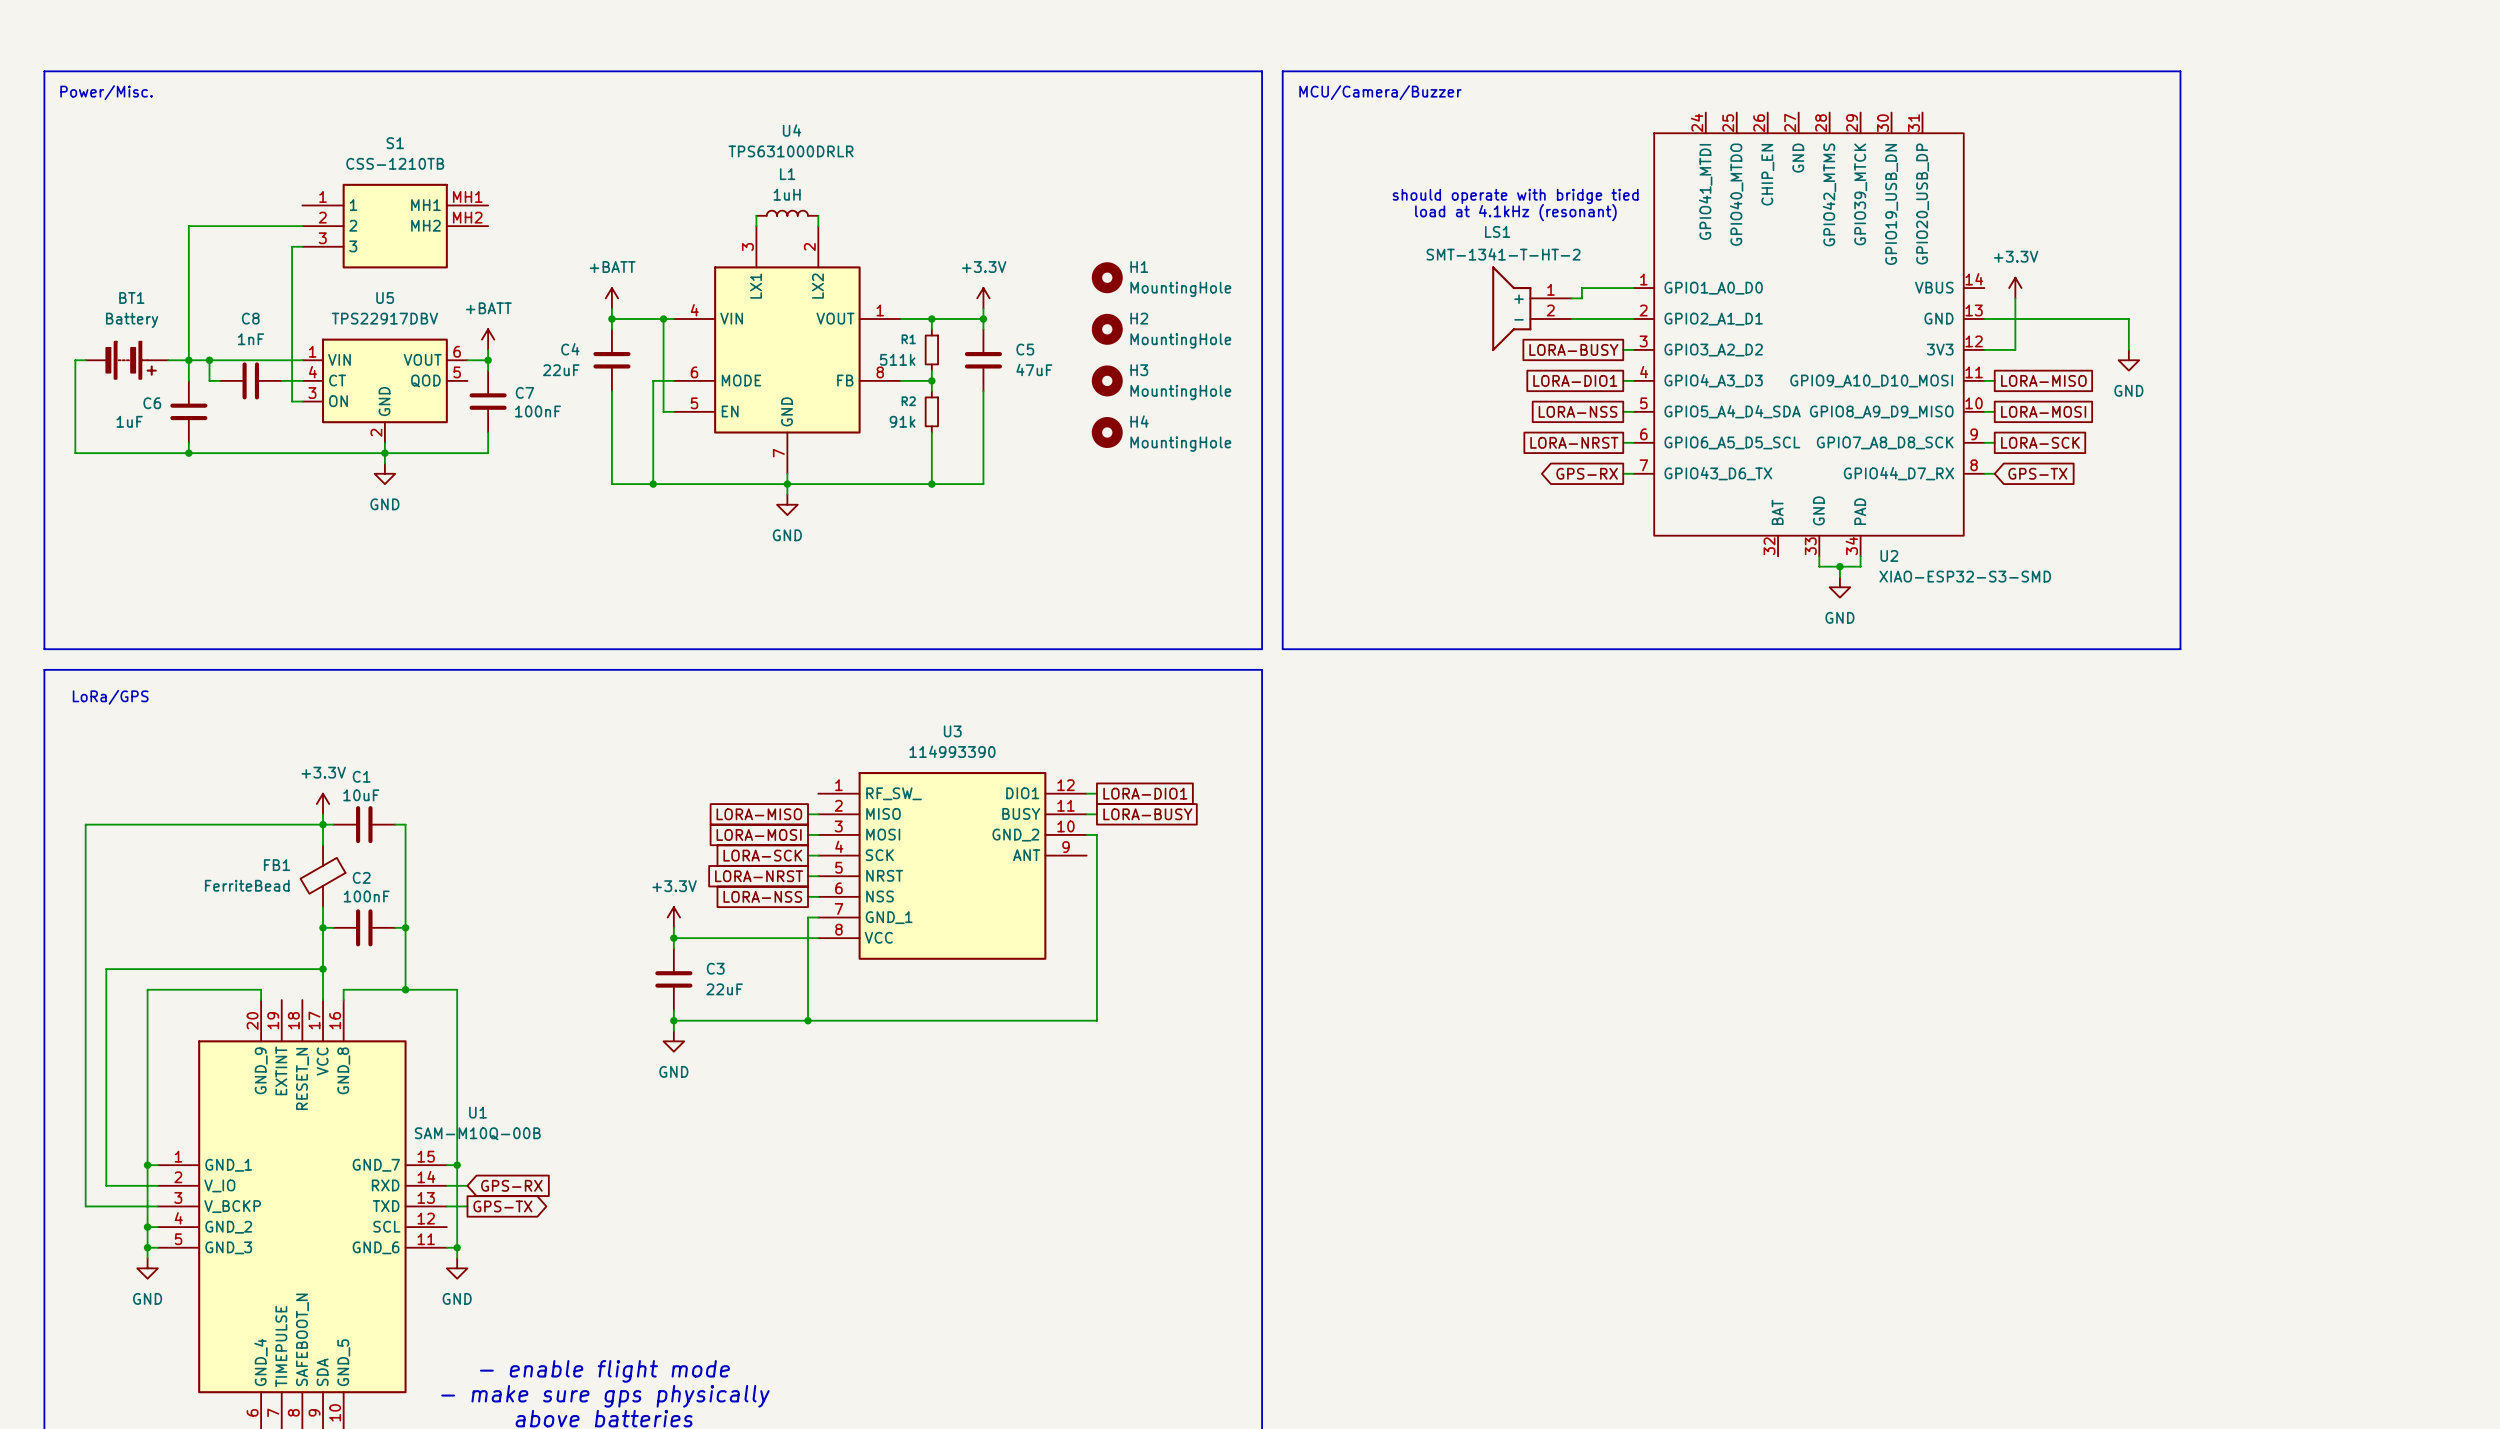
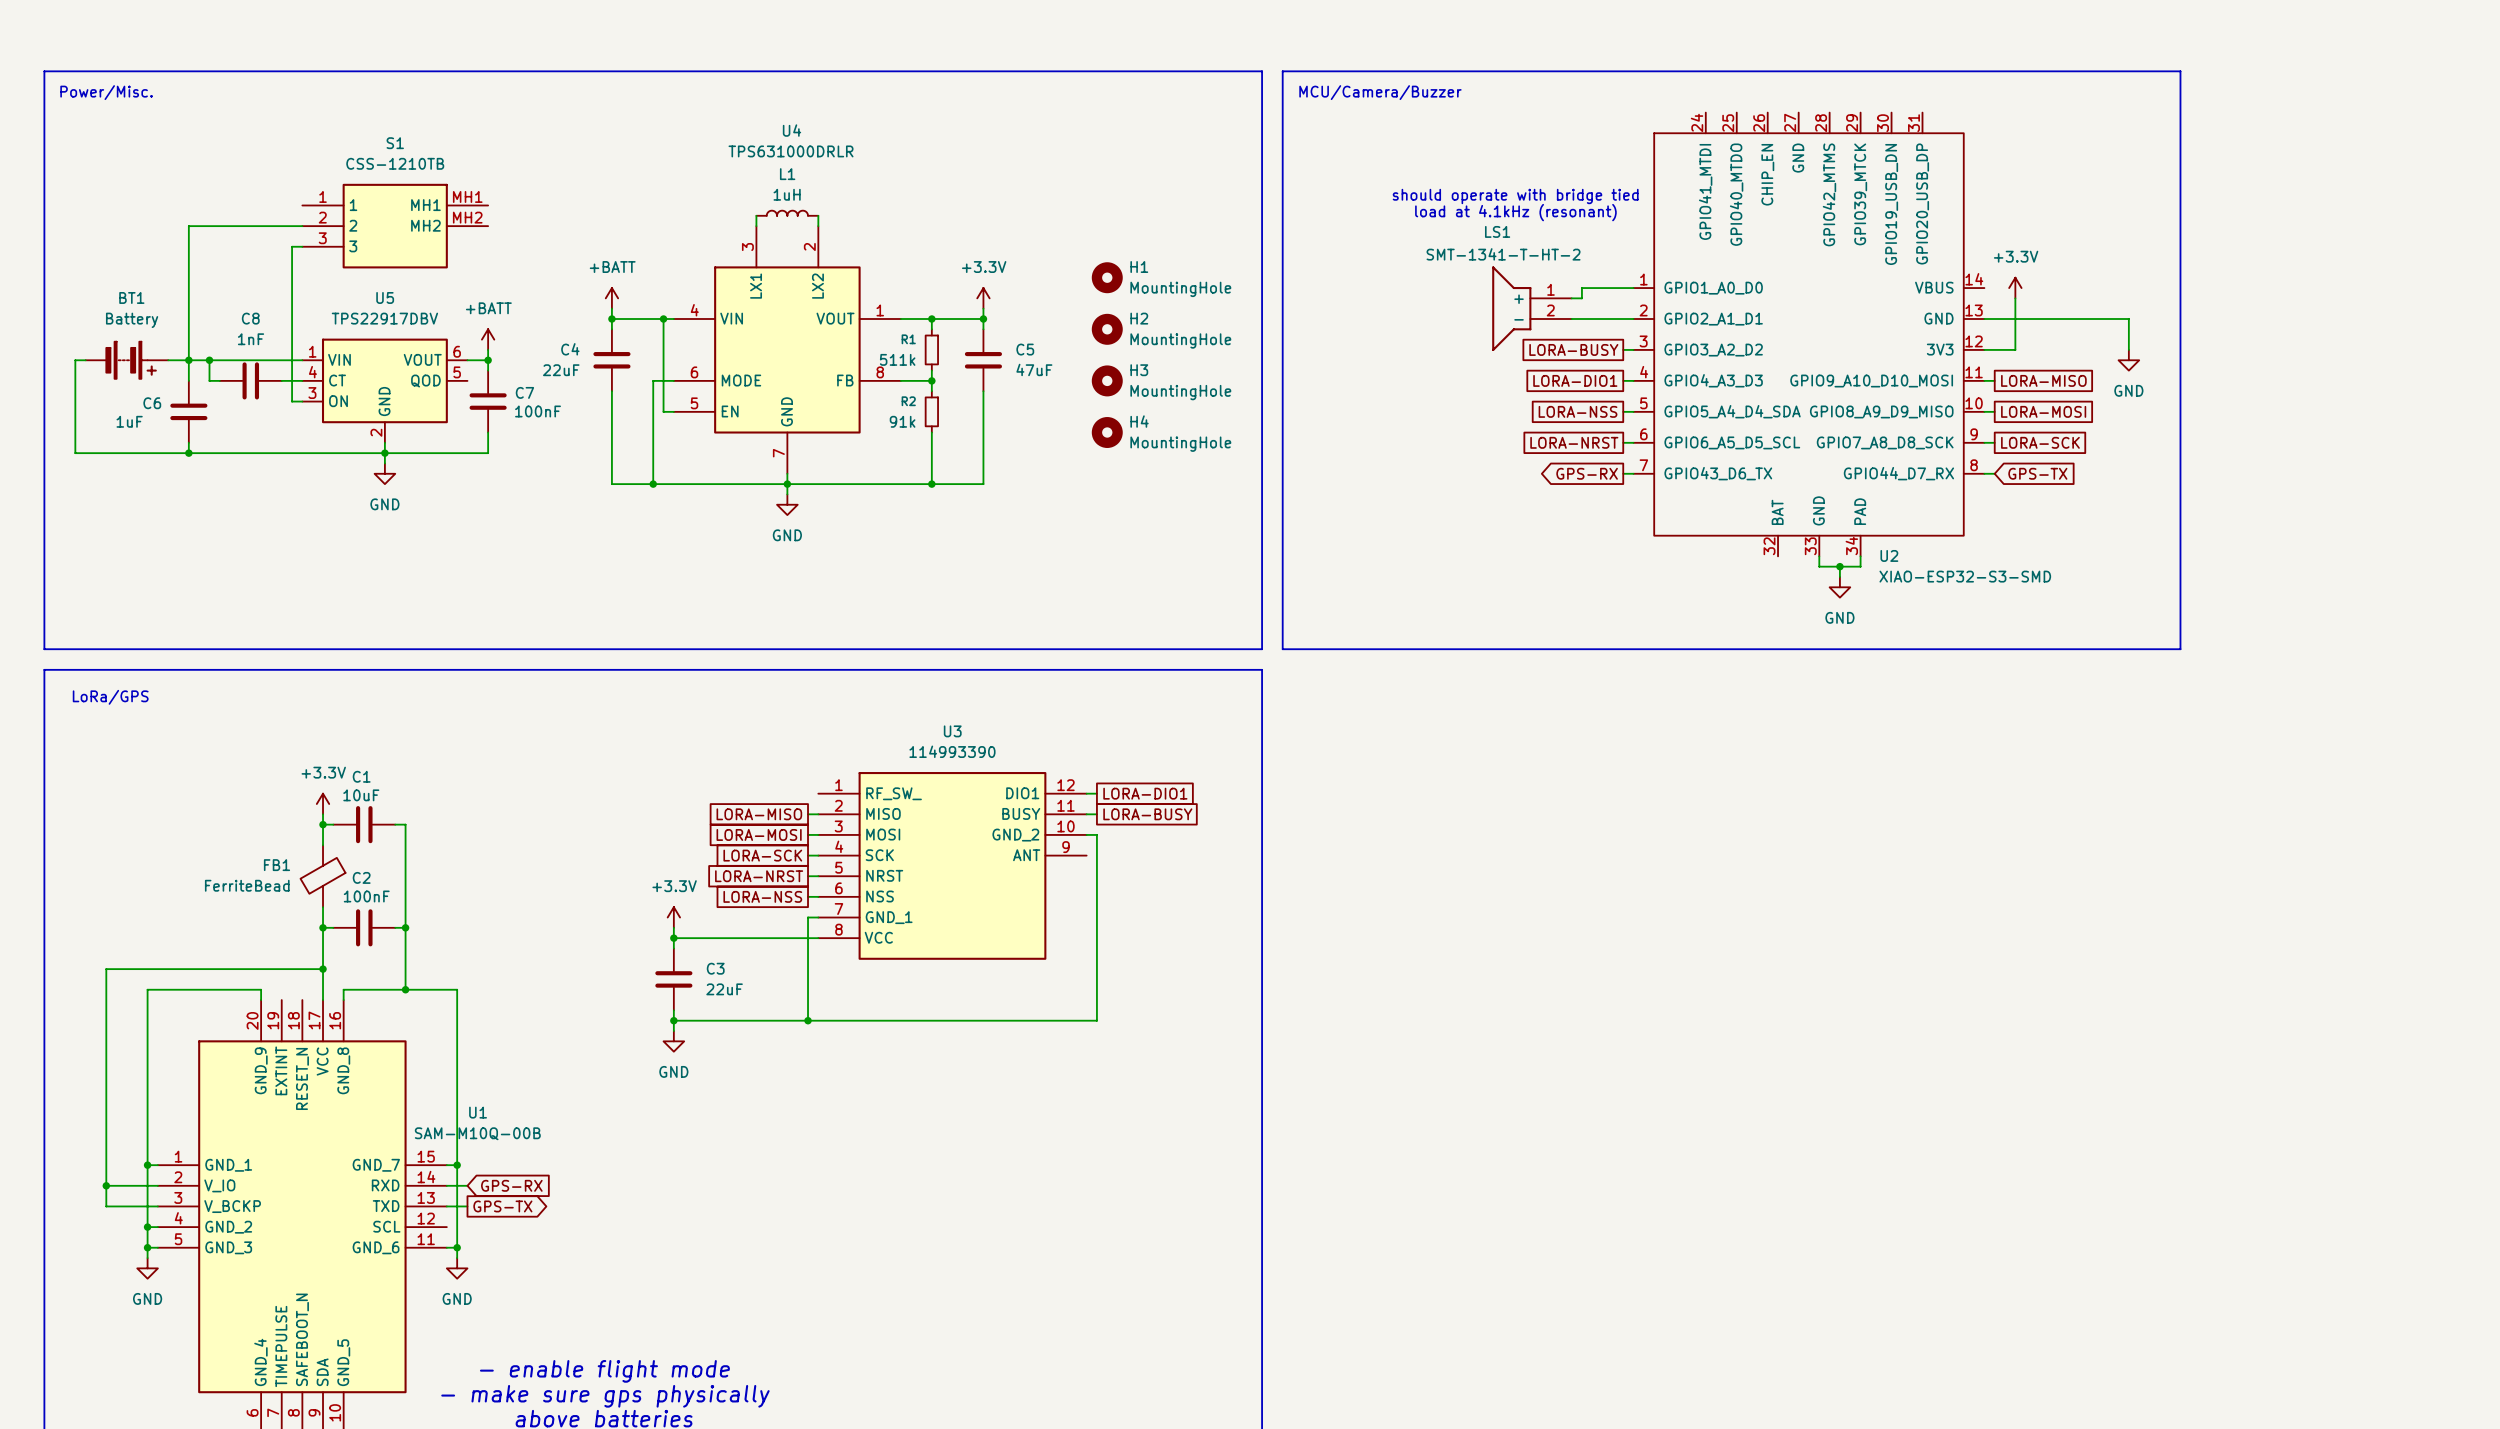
wire: (323, 824) (85, 824) (85, 1206) (106, 1206) -> (106, 1185) (106, 1206)
junction: none -> (106, 1185)

